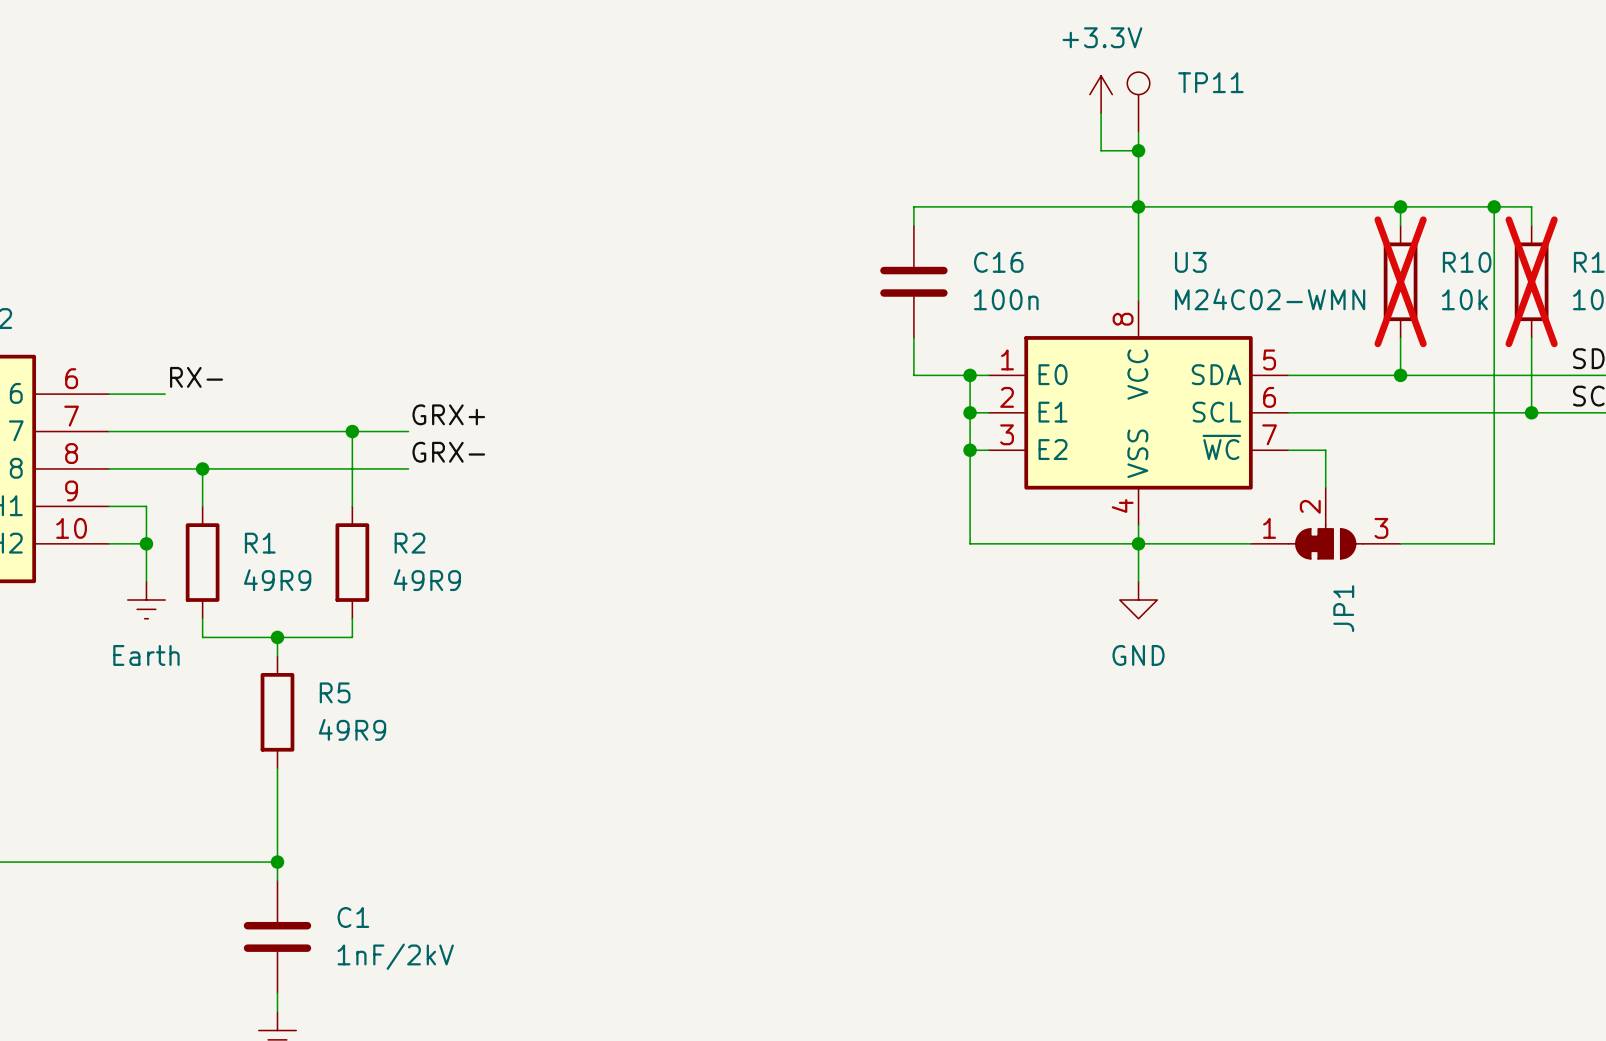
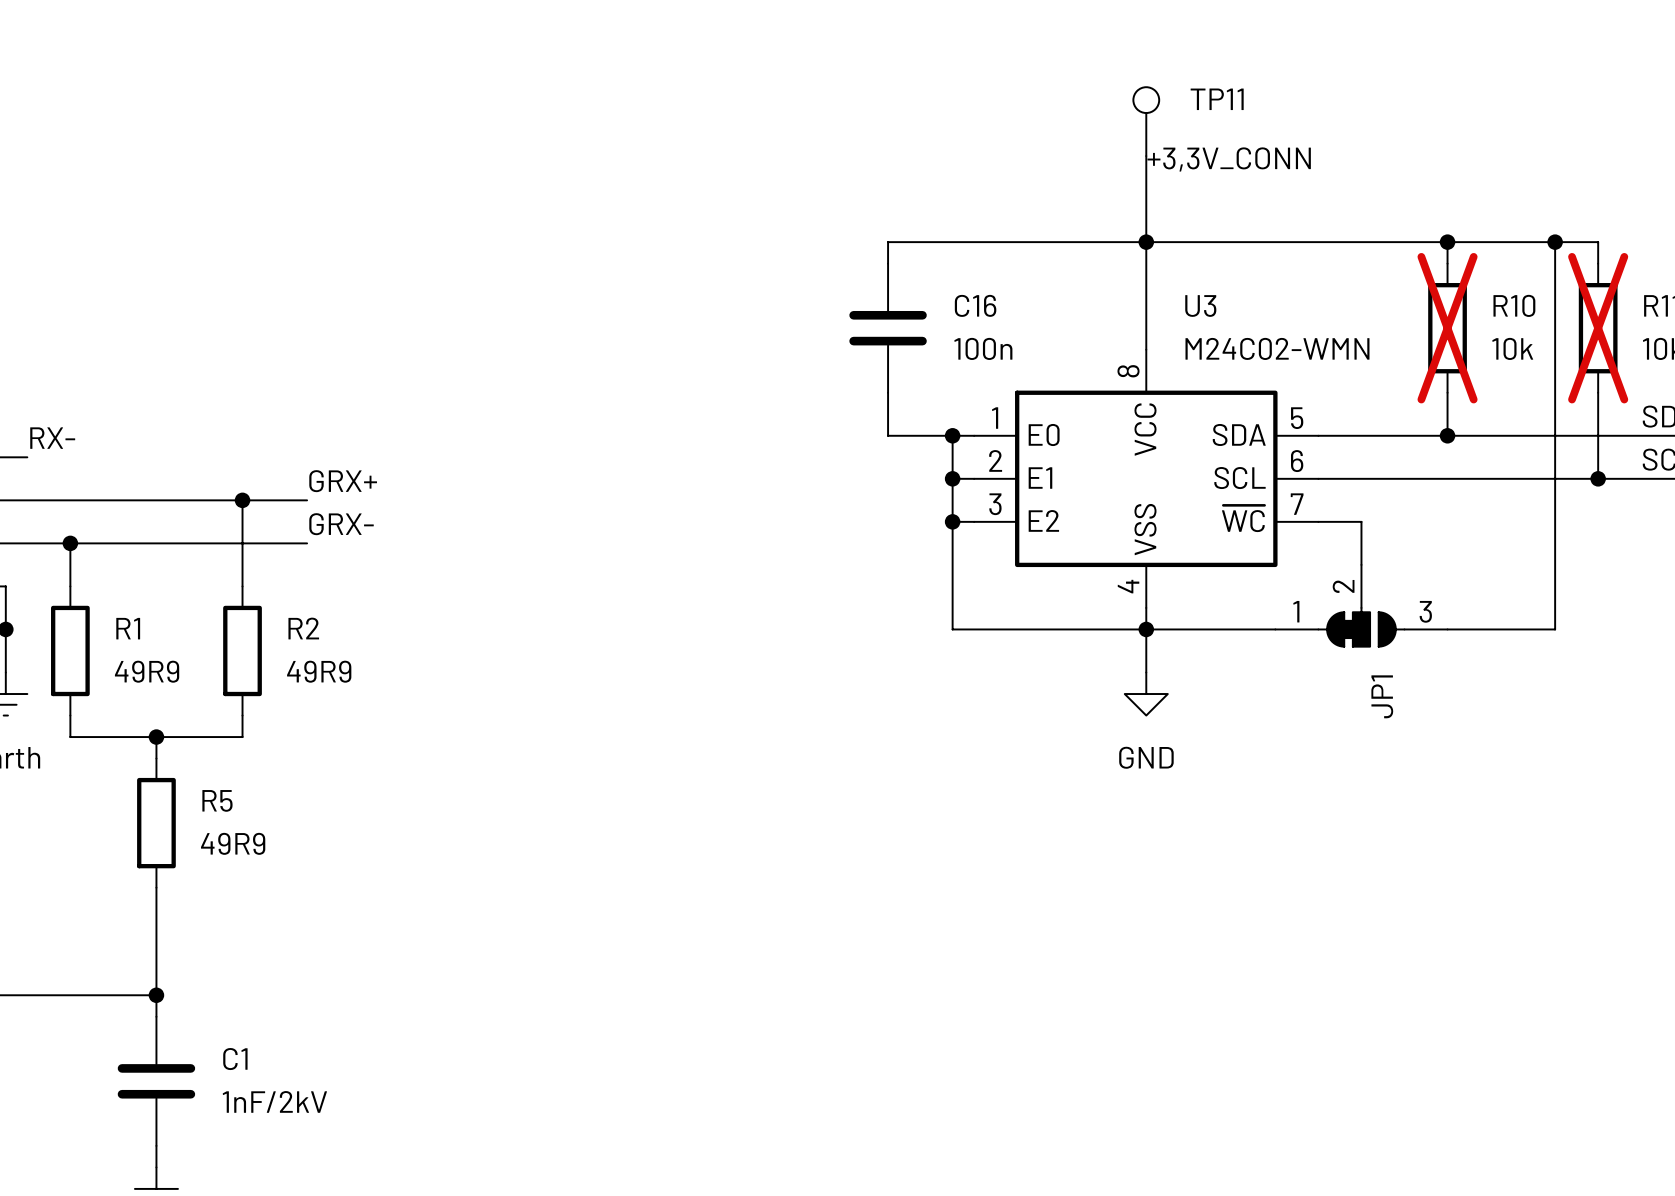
power symbol: +3.3V (1101, 94) -> none
wire: (1101, 113) (1101, 150) (1138, 150) -> none
label: none -> +3,3V_CONN (1229, 159)
junction: (1138, 150) -> none

